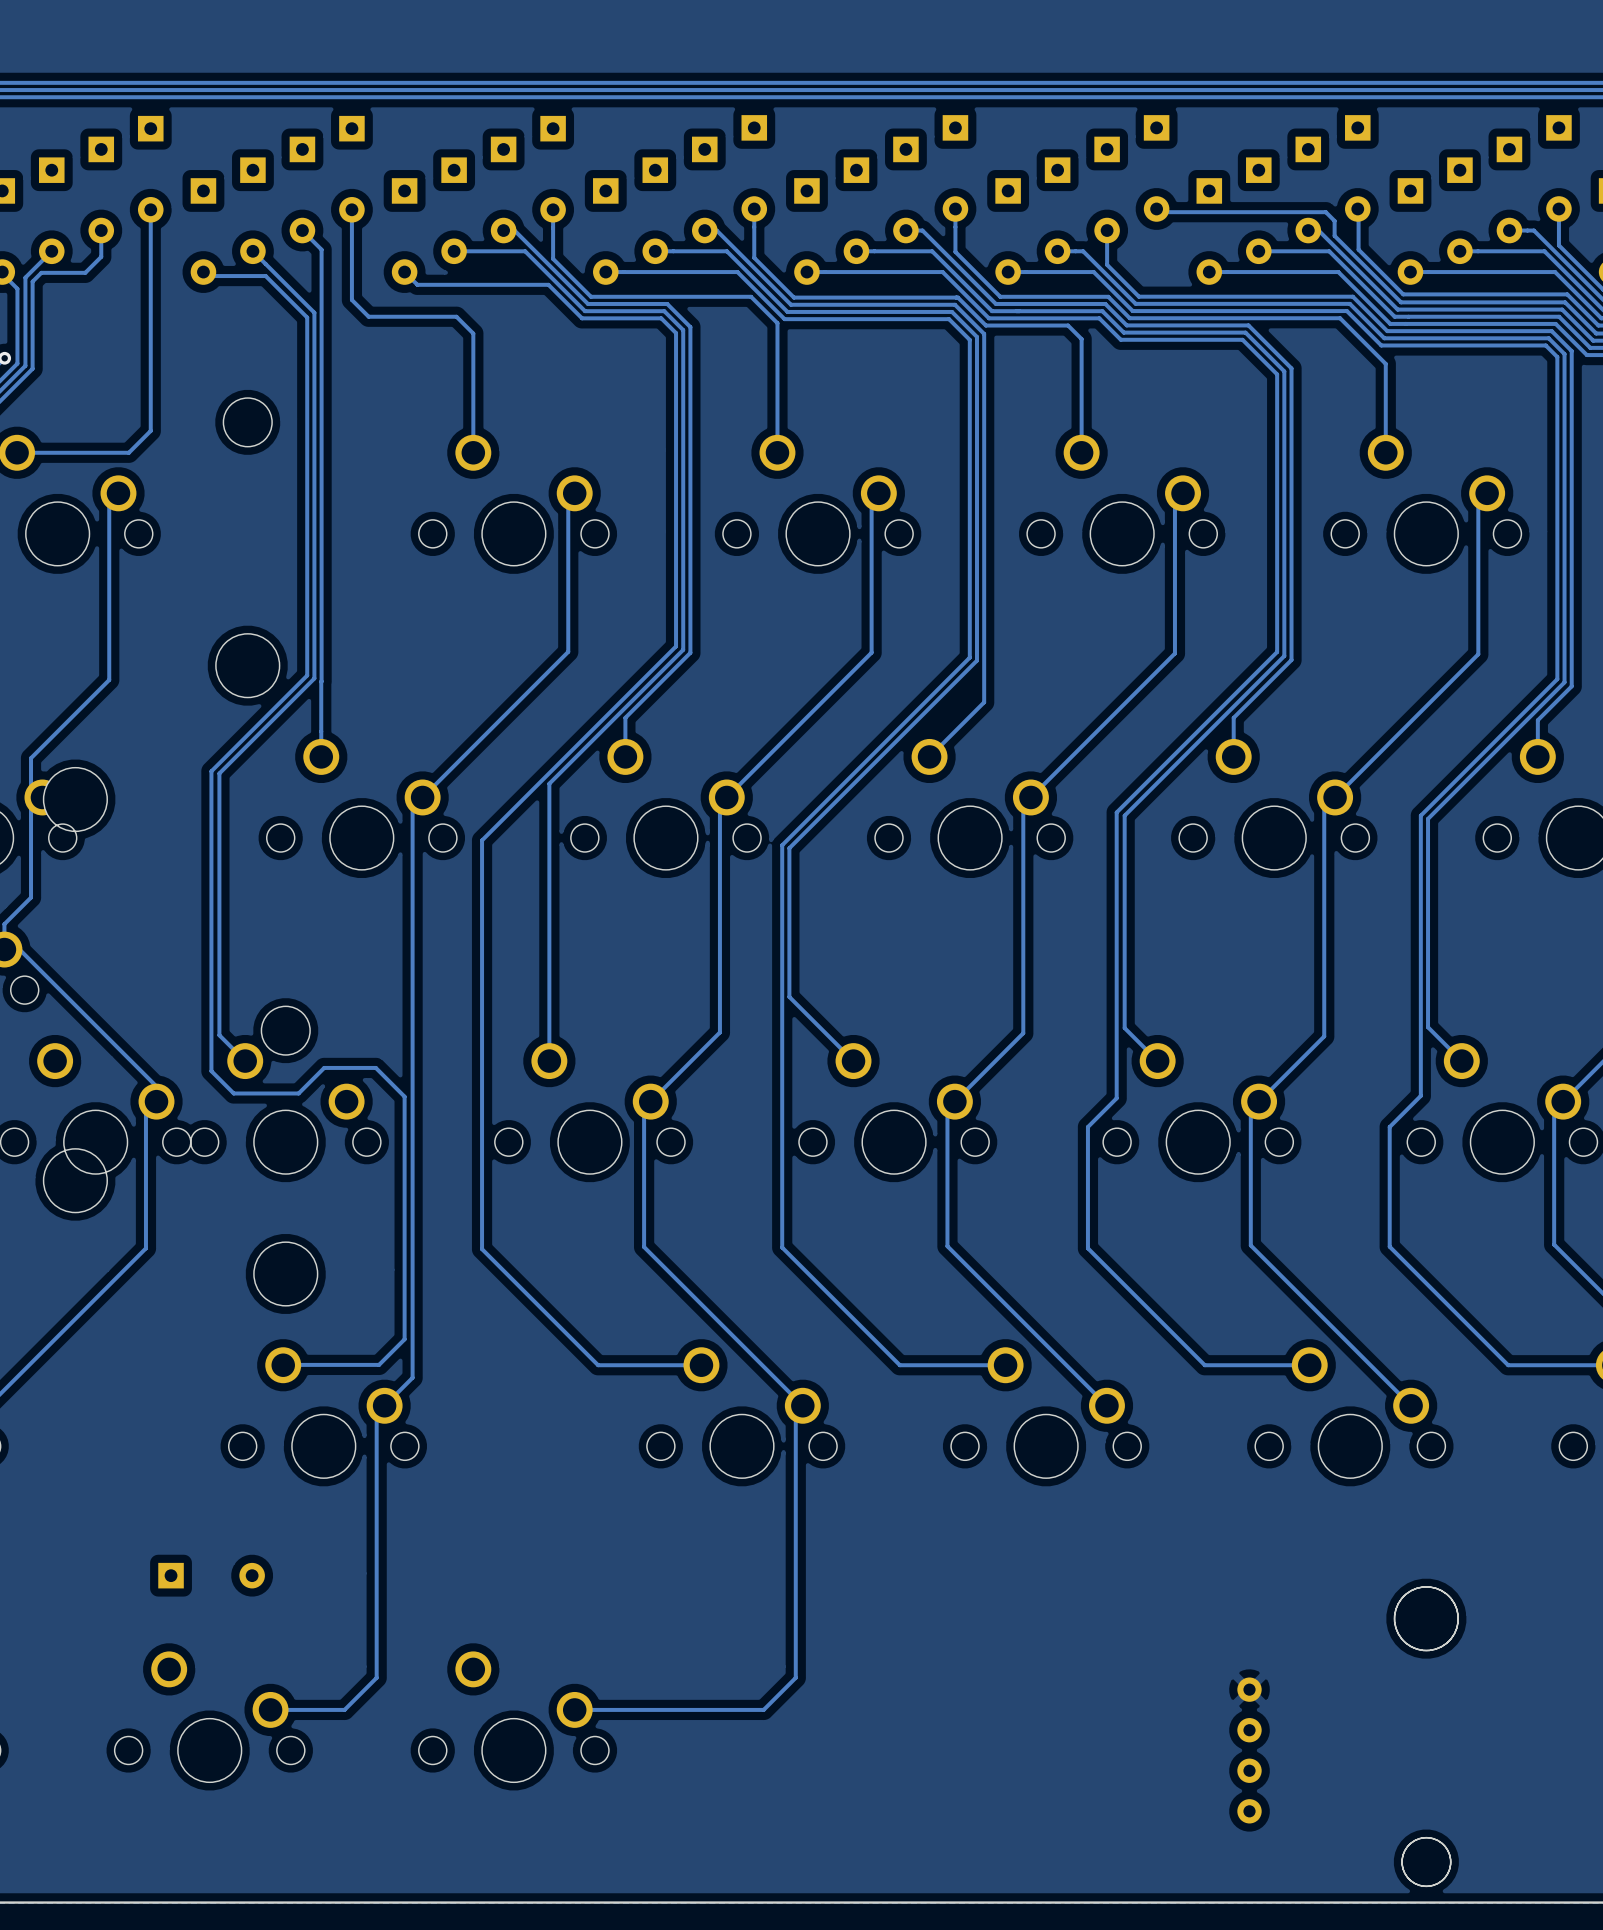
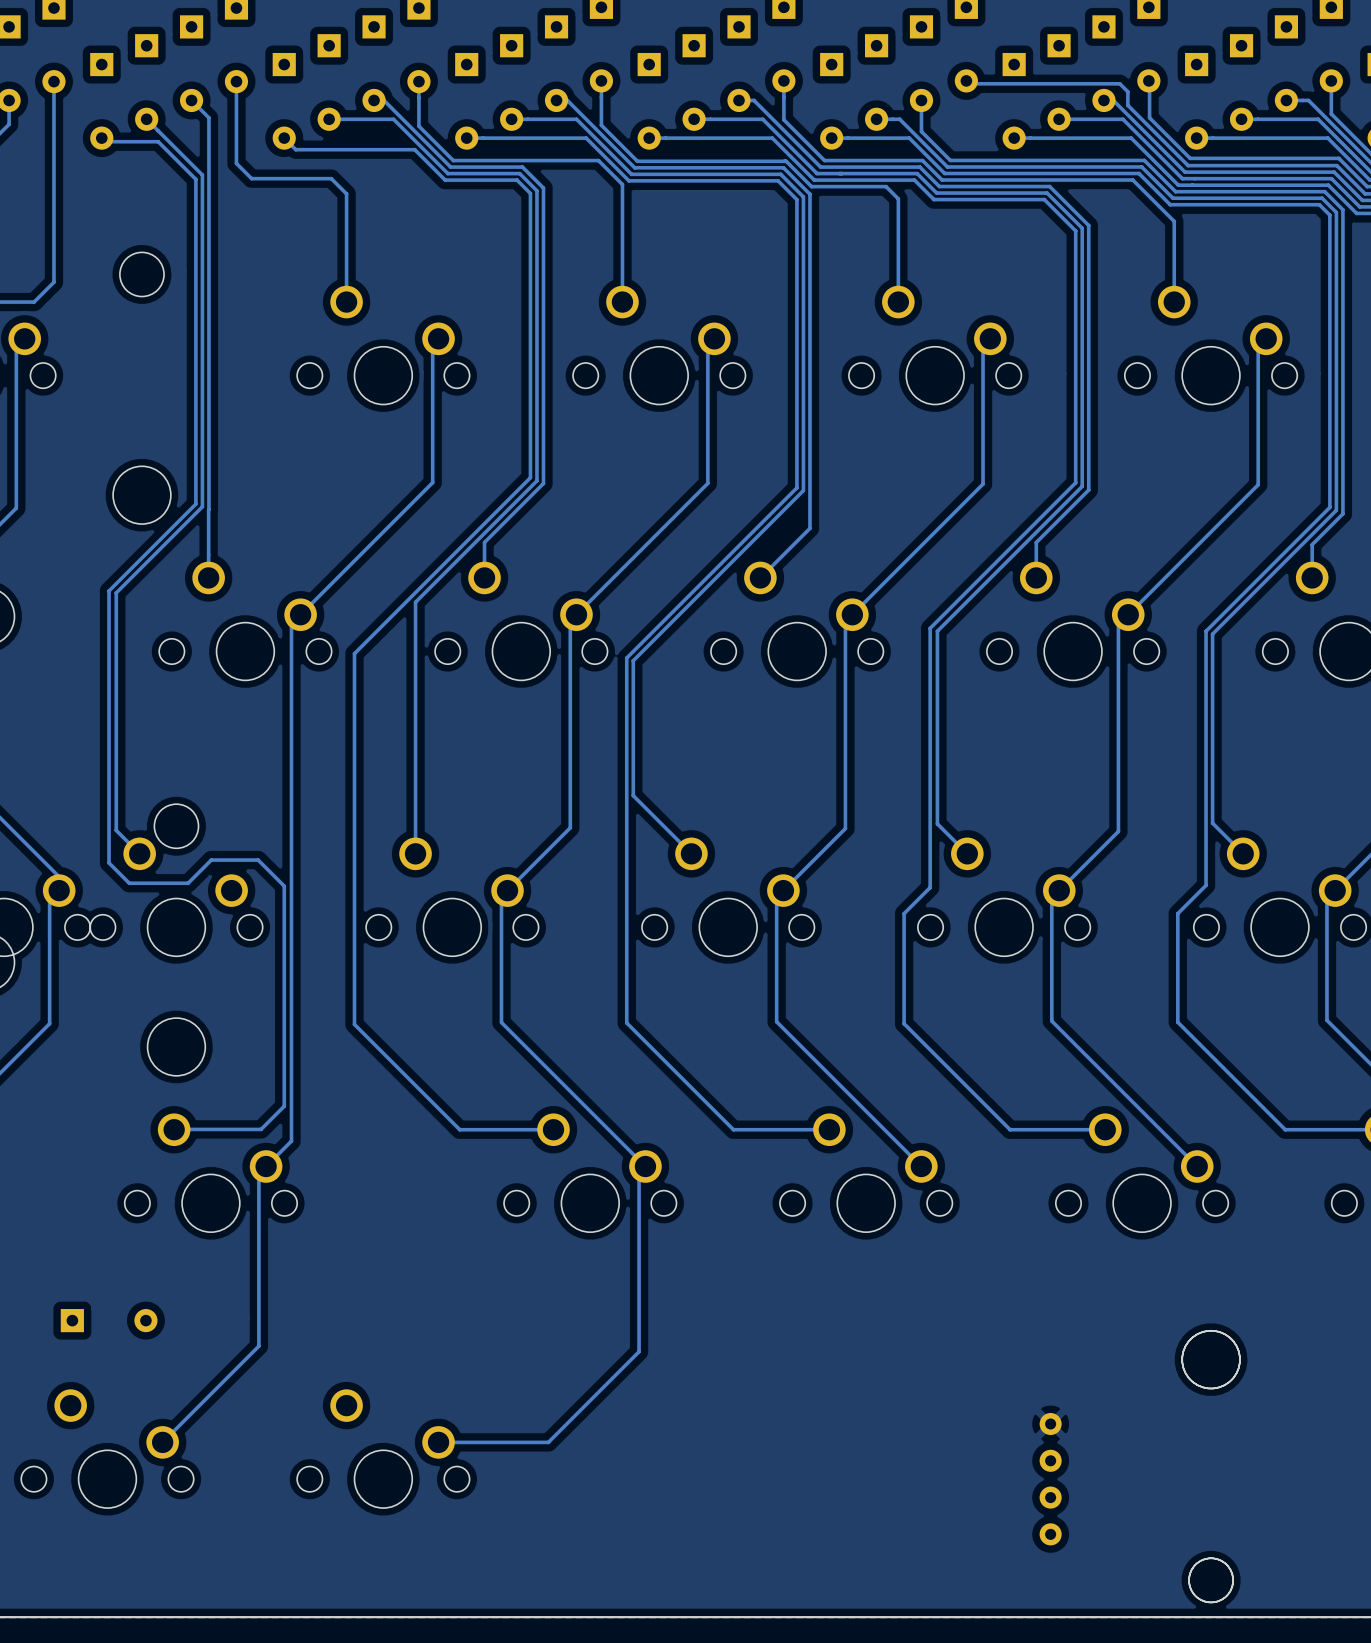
track: (376, 1603) (376, 1677) (344, 1709) (270, 1709) -> (258, 1346) (162, 1442)
track: (795, 1609) (795, 1677) (763, 1709) (695, 1709) -> (639, 1351) (548, 1442)

